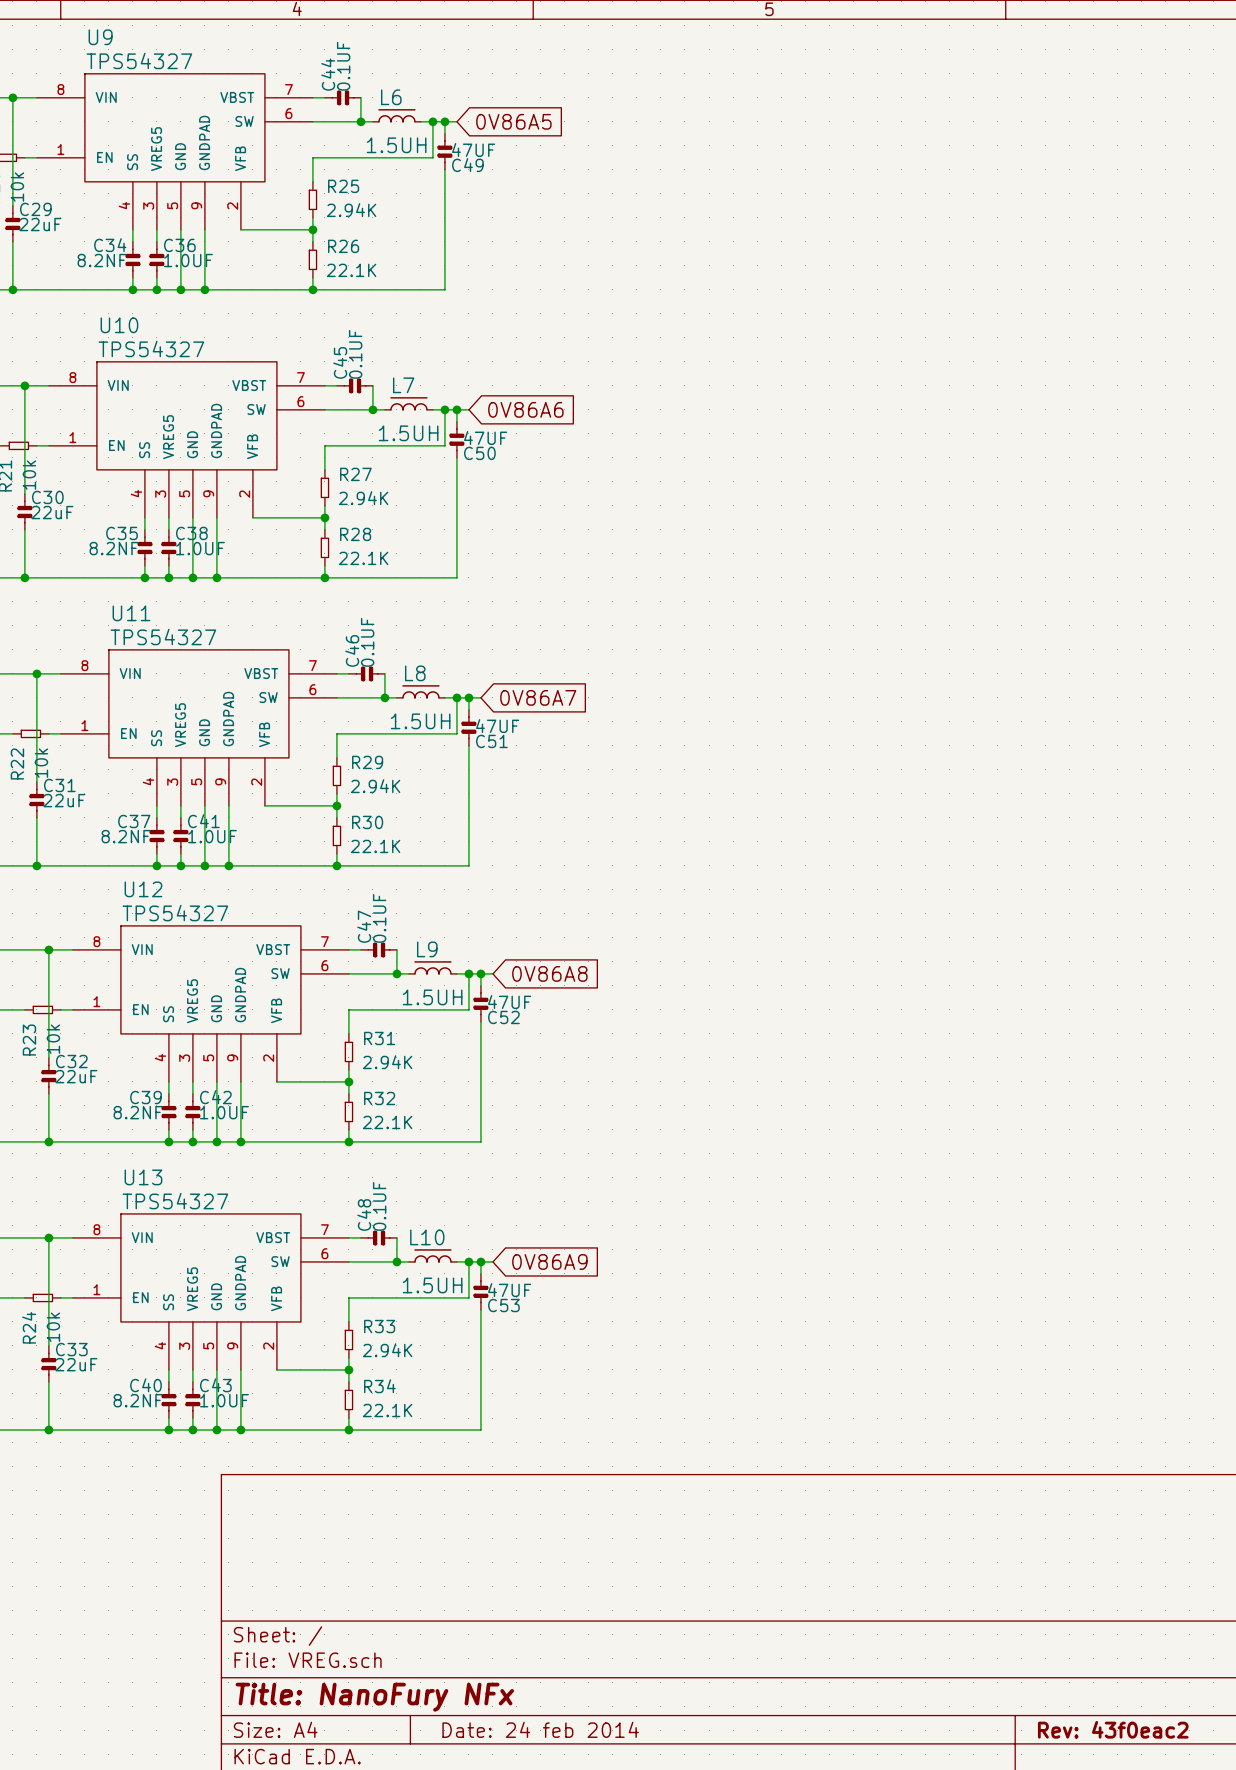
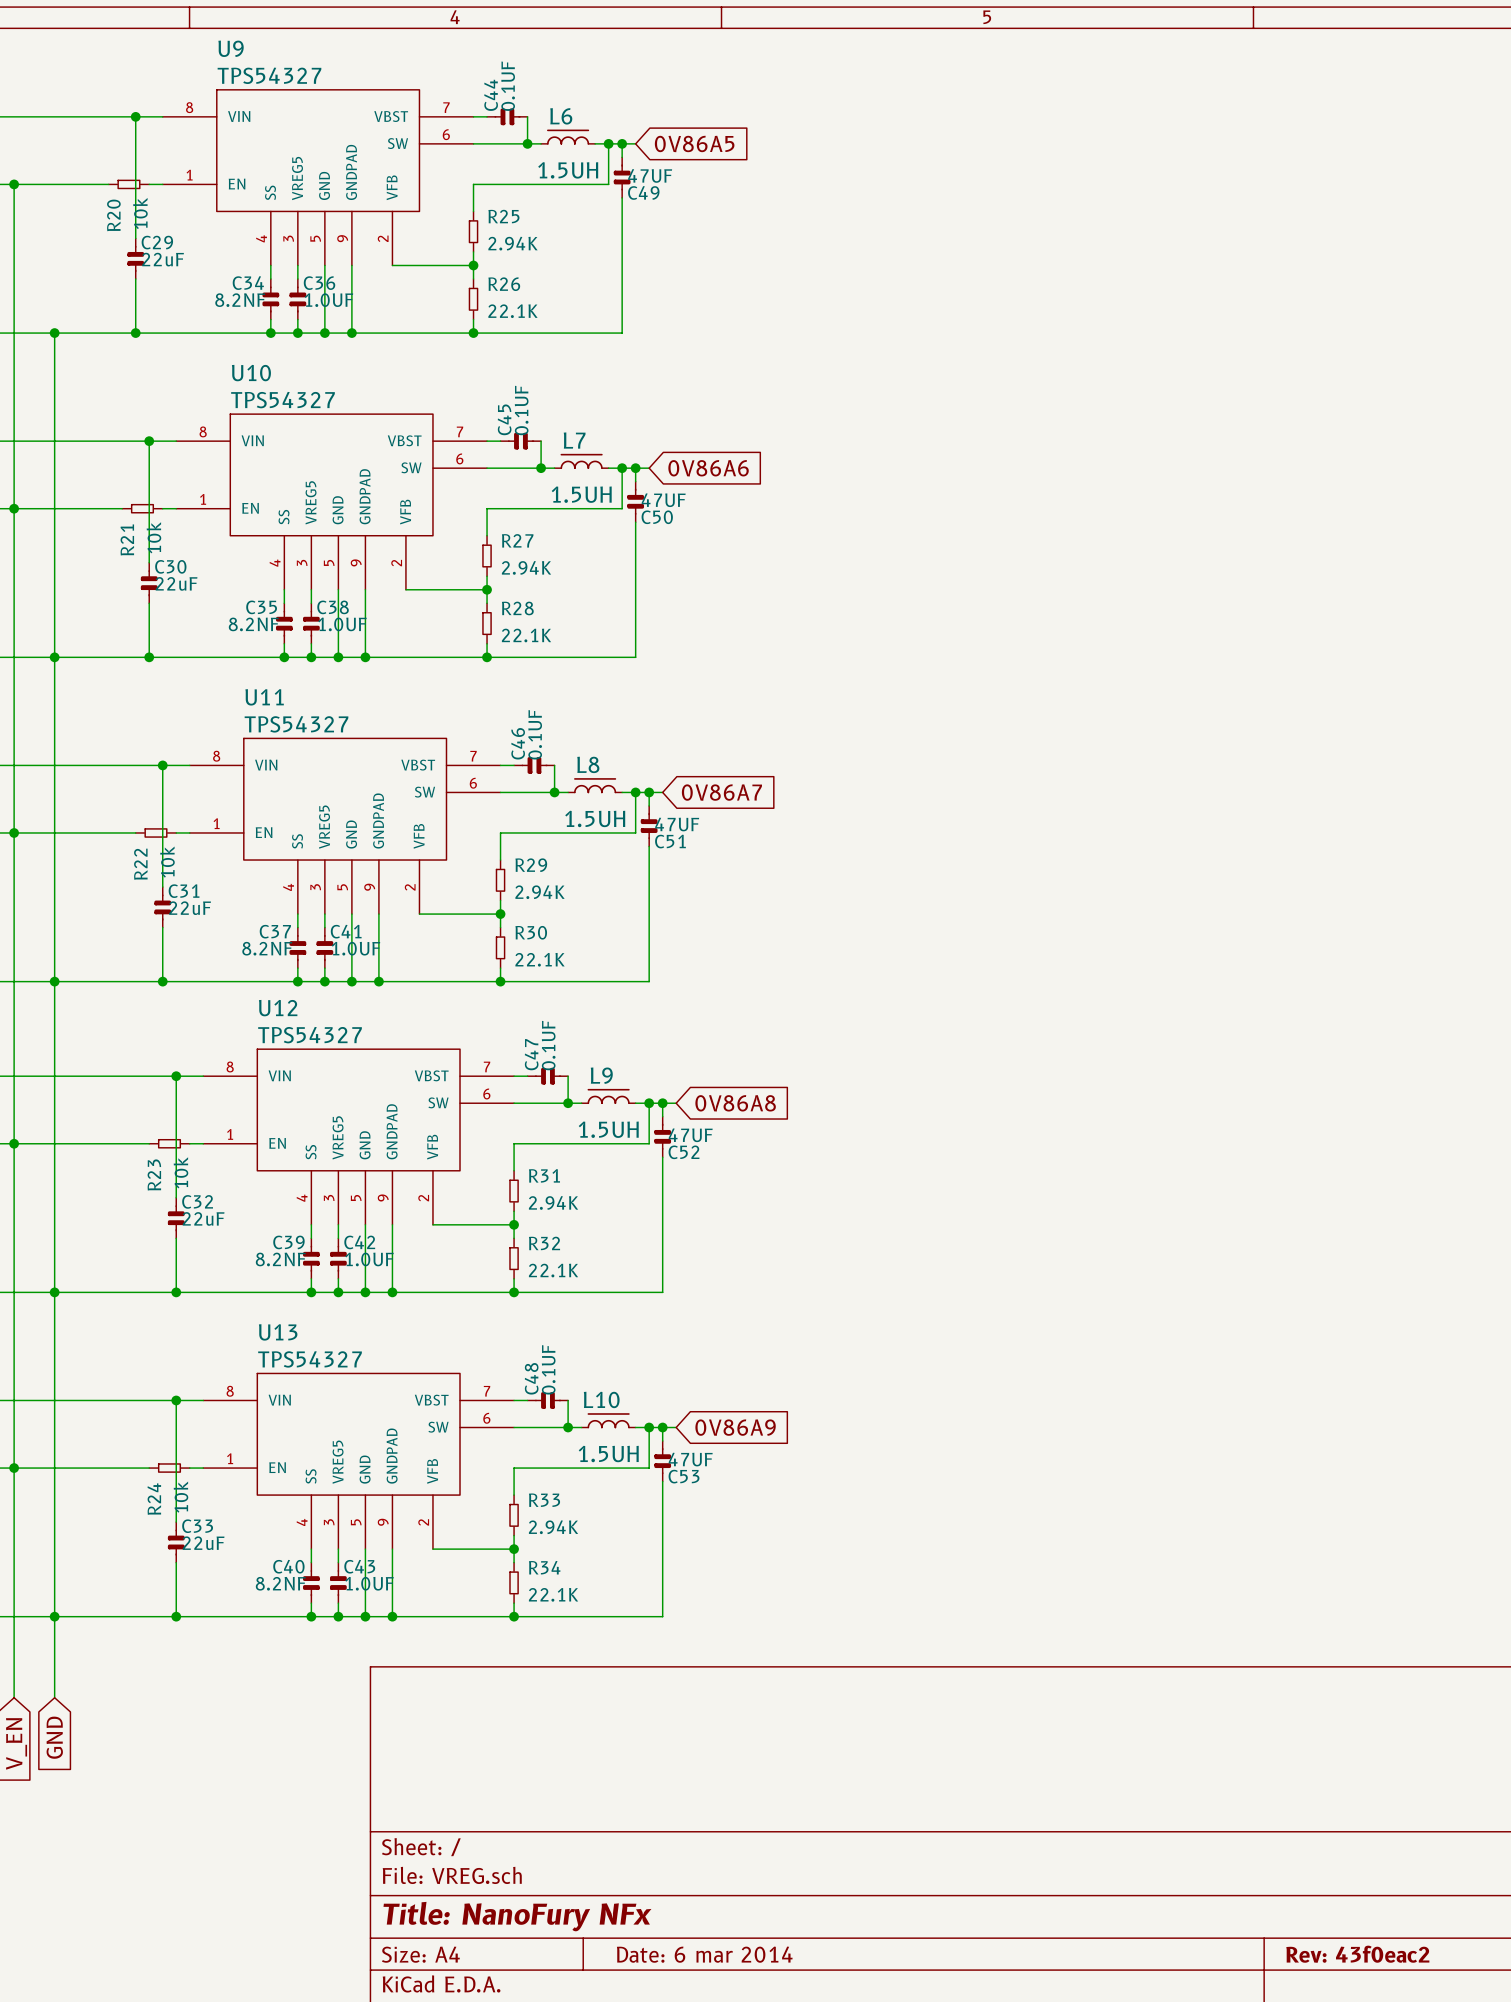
title block: Date: 24 feb 2014 (540, 1729) -> Date: 6 mar 2014 (704, 1954)

